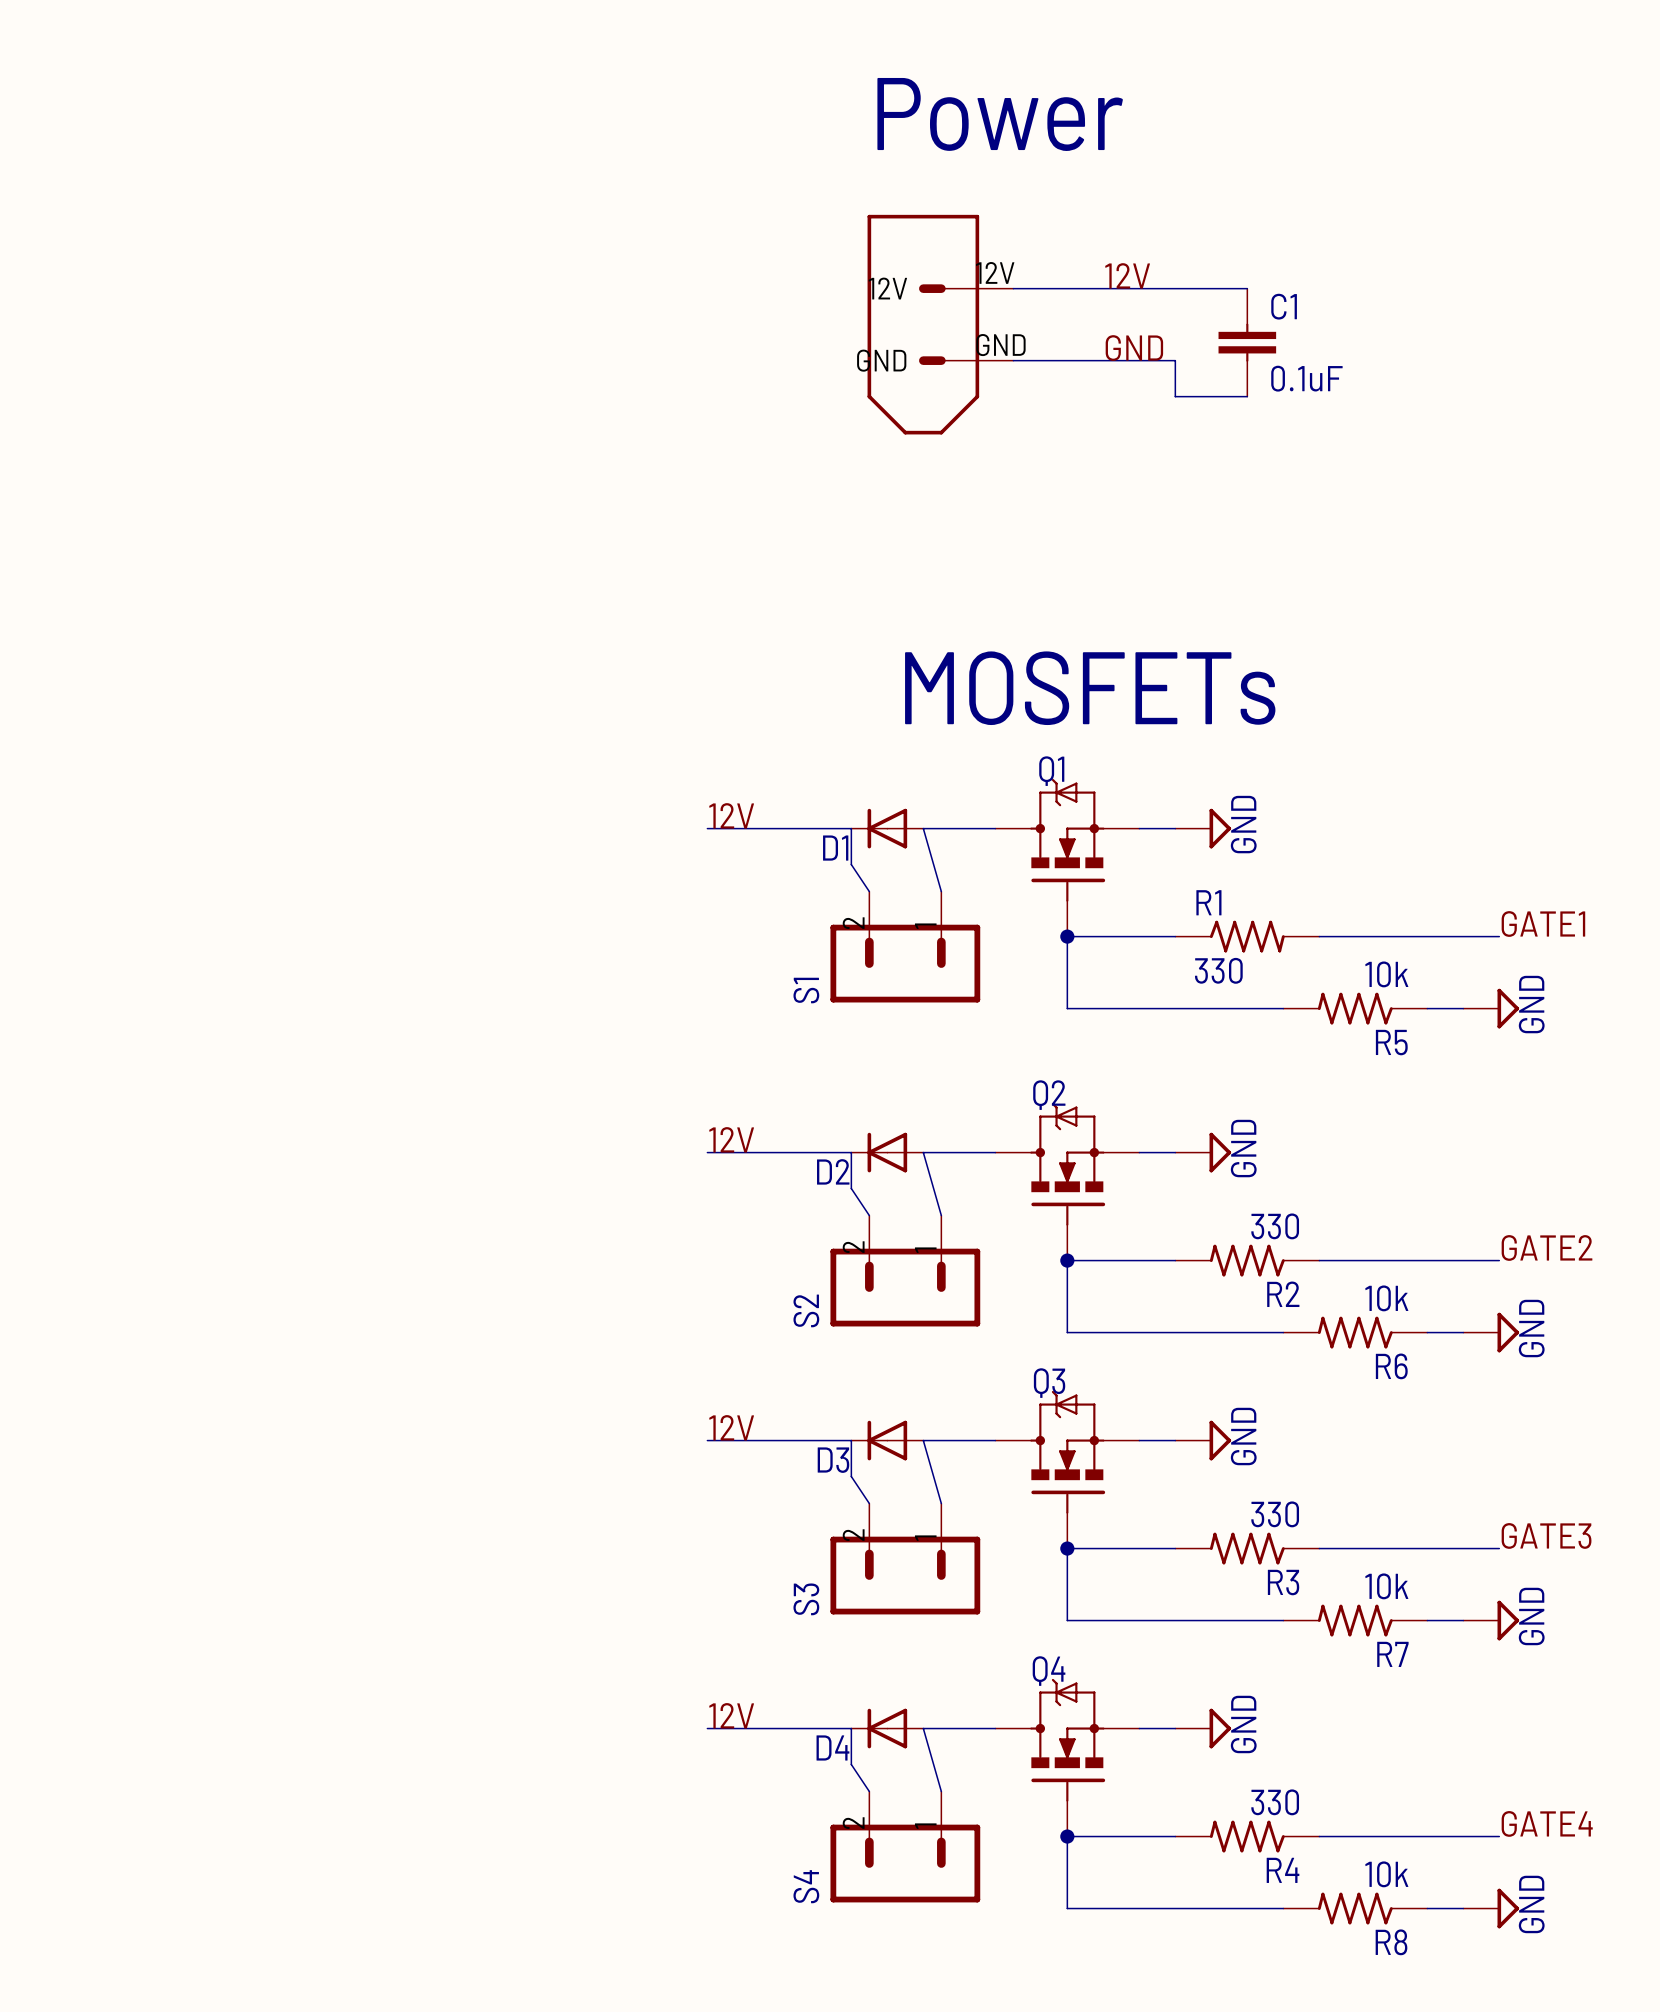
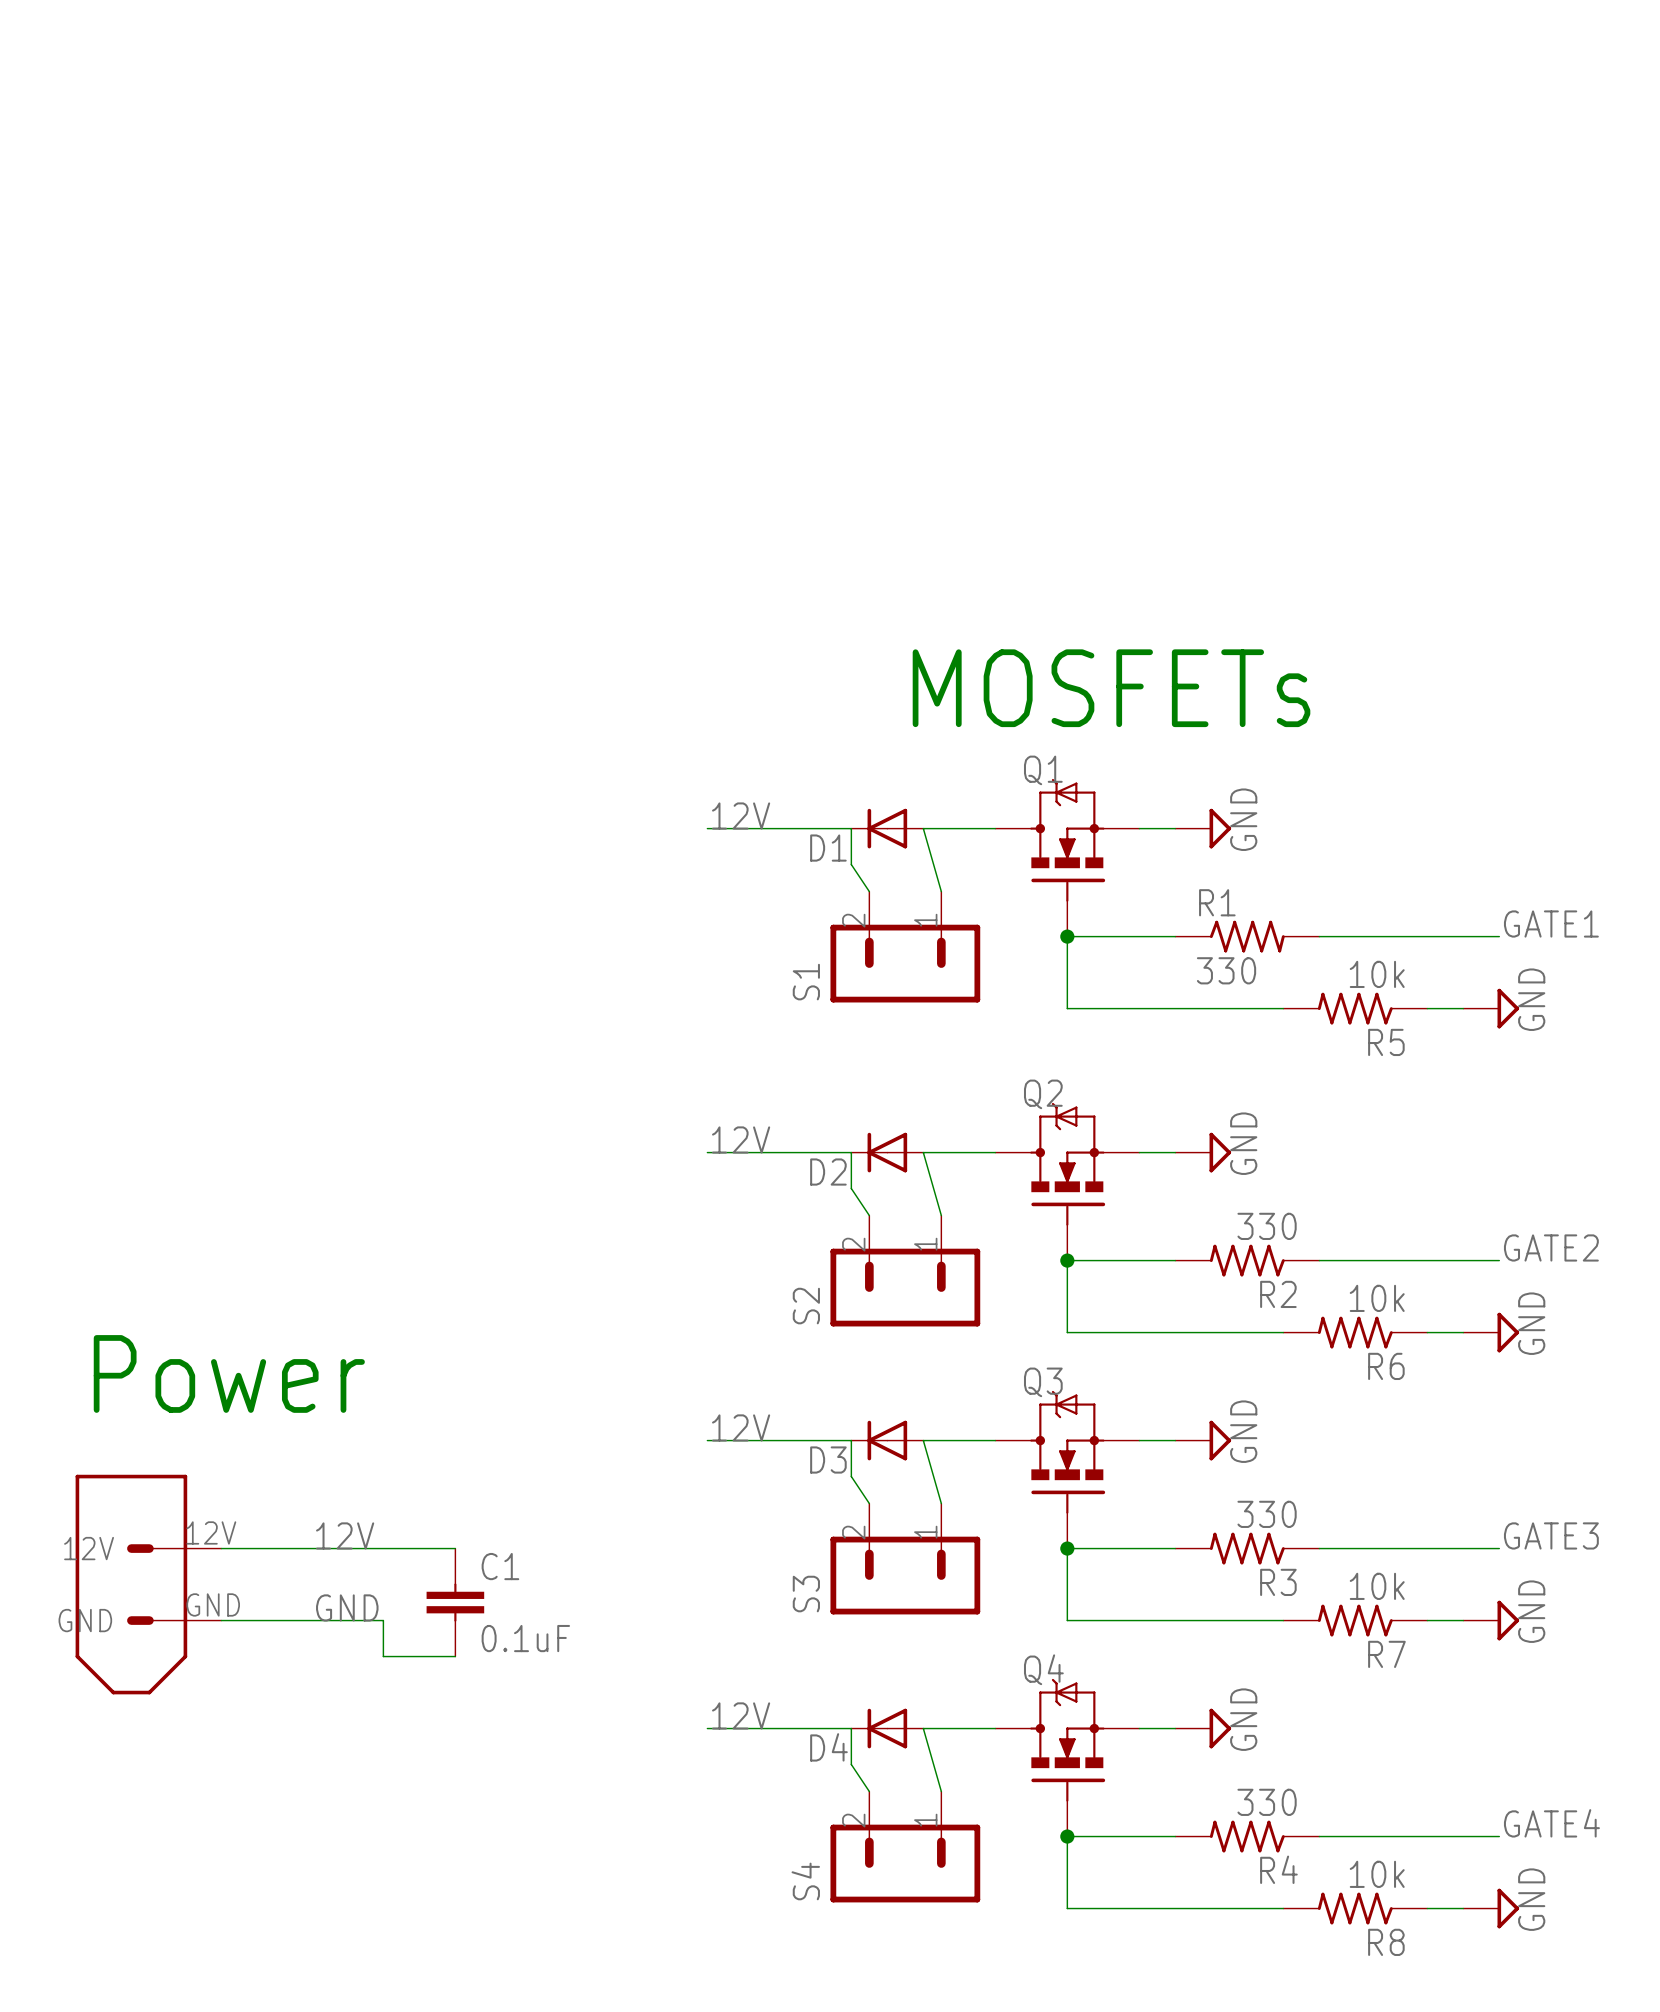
text: Power (1000, 114) -> none
label: 12V (1127, 275) -> none
wire: (1013, 288) (1247, 288) -> none
part: (940, 324) -> none
C1 position: (1247, 342) -> (455, 1602)
label: GND (1134, 348) -> none
wire: (1013, 360) (1175, 360) (1175, 396) (1247, 396) -> none
text: none -> Power (229, 1373)
label: none -> 12V (345, 1535)
wire: none -> (221, 1548) (455, 1548)
part: none -> (148, 1584)
label: none -> GND (347, 1607)
wire: none -> (221, 1620) (383, 1620) (383, 1656) (455, 1656)

